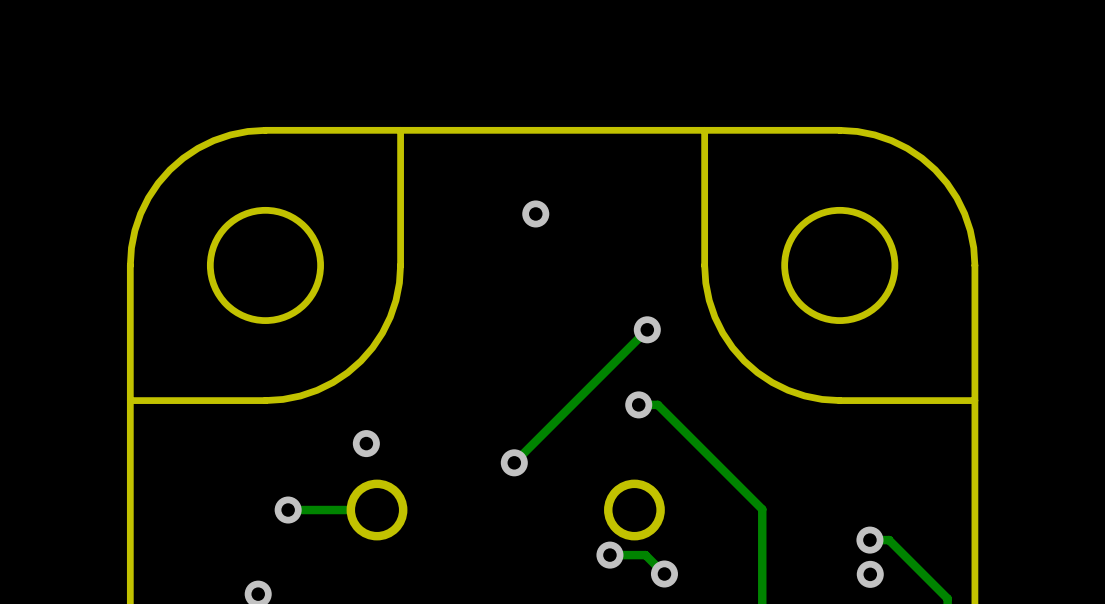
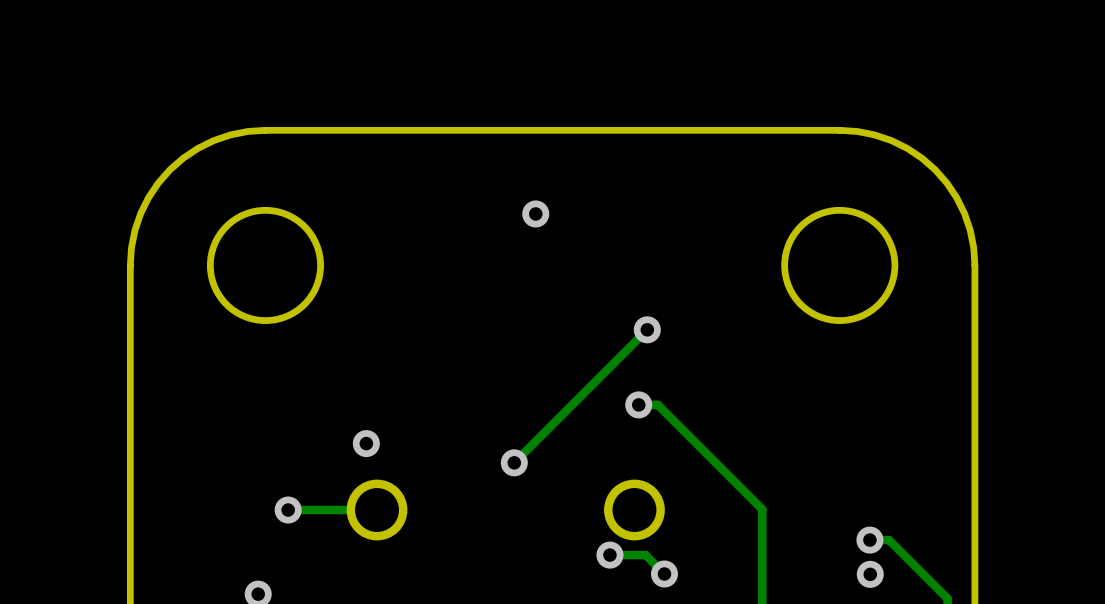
board edge: (400, 130) (399, 283) (390, 317) (372, 347) (361, 361) (347, 372) (317, 390) (283, 399) (130, 400) -> none
board edge: (704, 130) (705, 283) (714, 317) (732, 347) (744, 361) (757, 372) (788, 390) (822, 399) (974, 400) -> none

